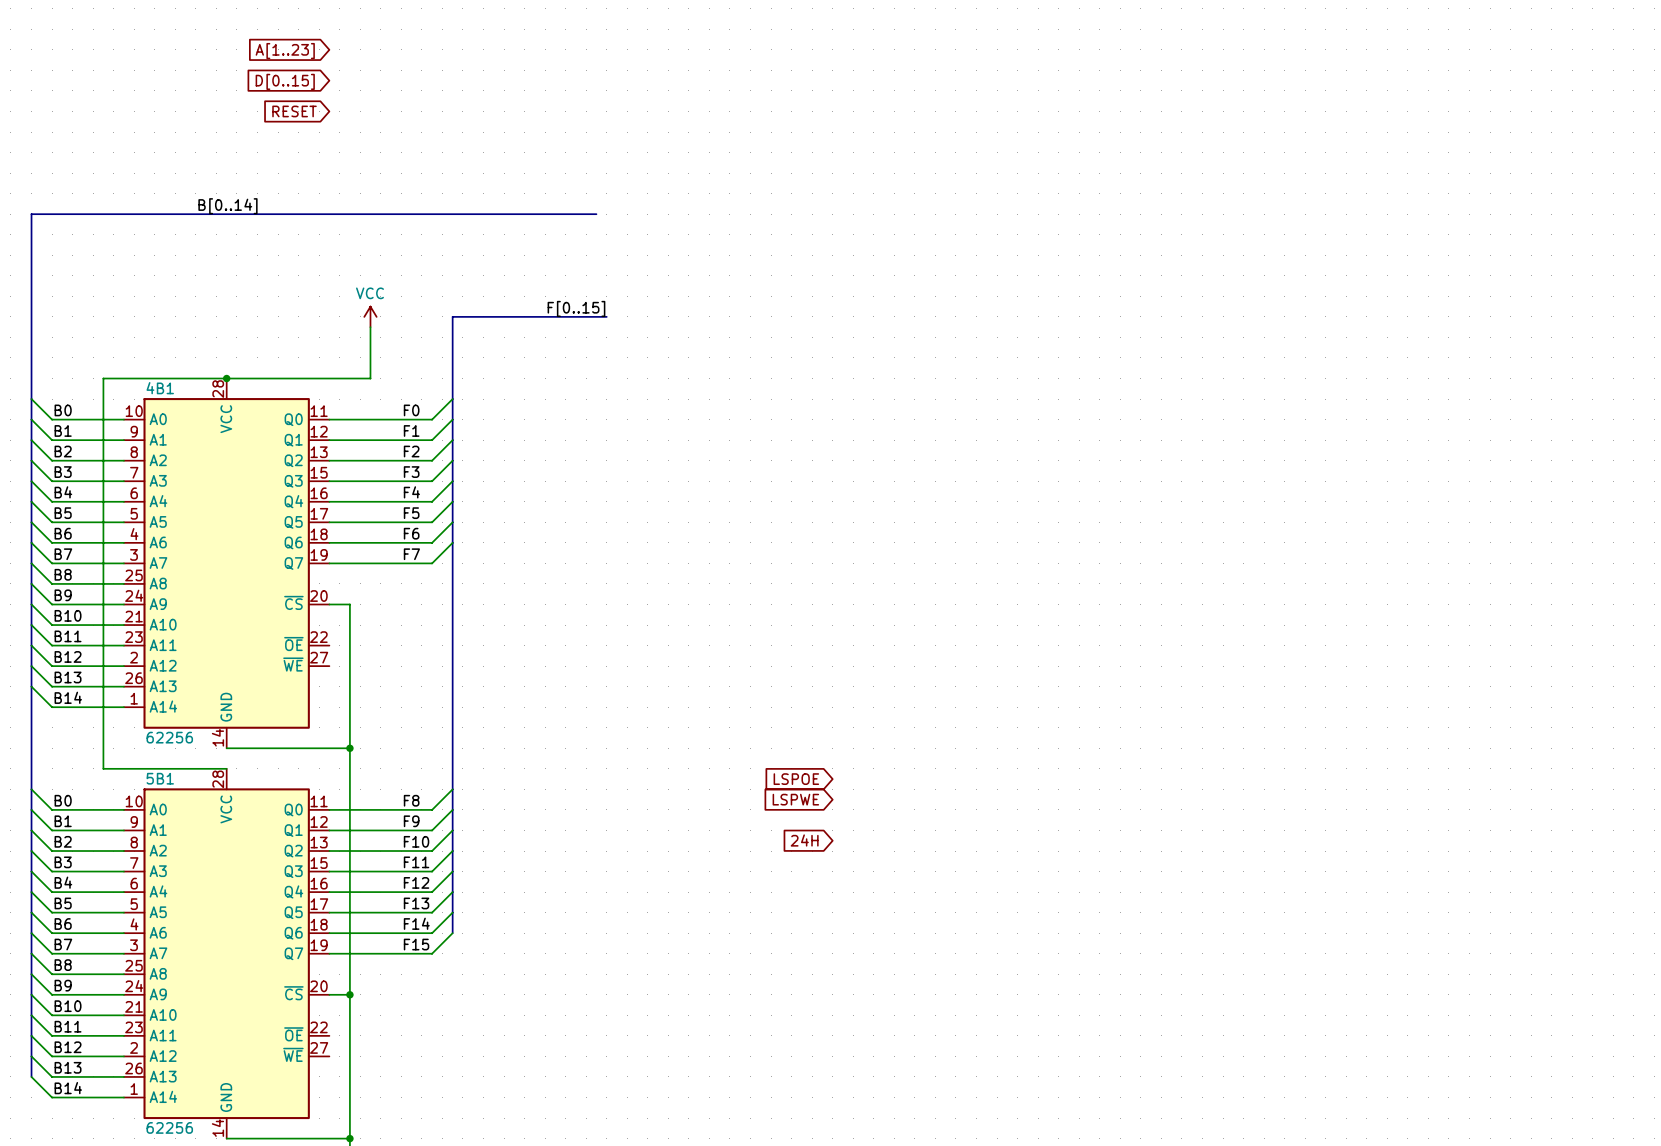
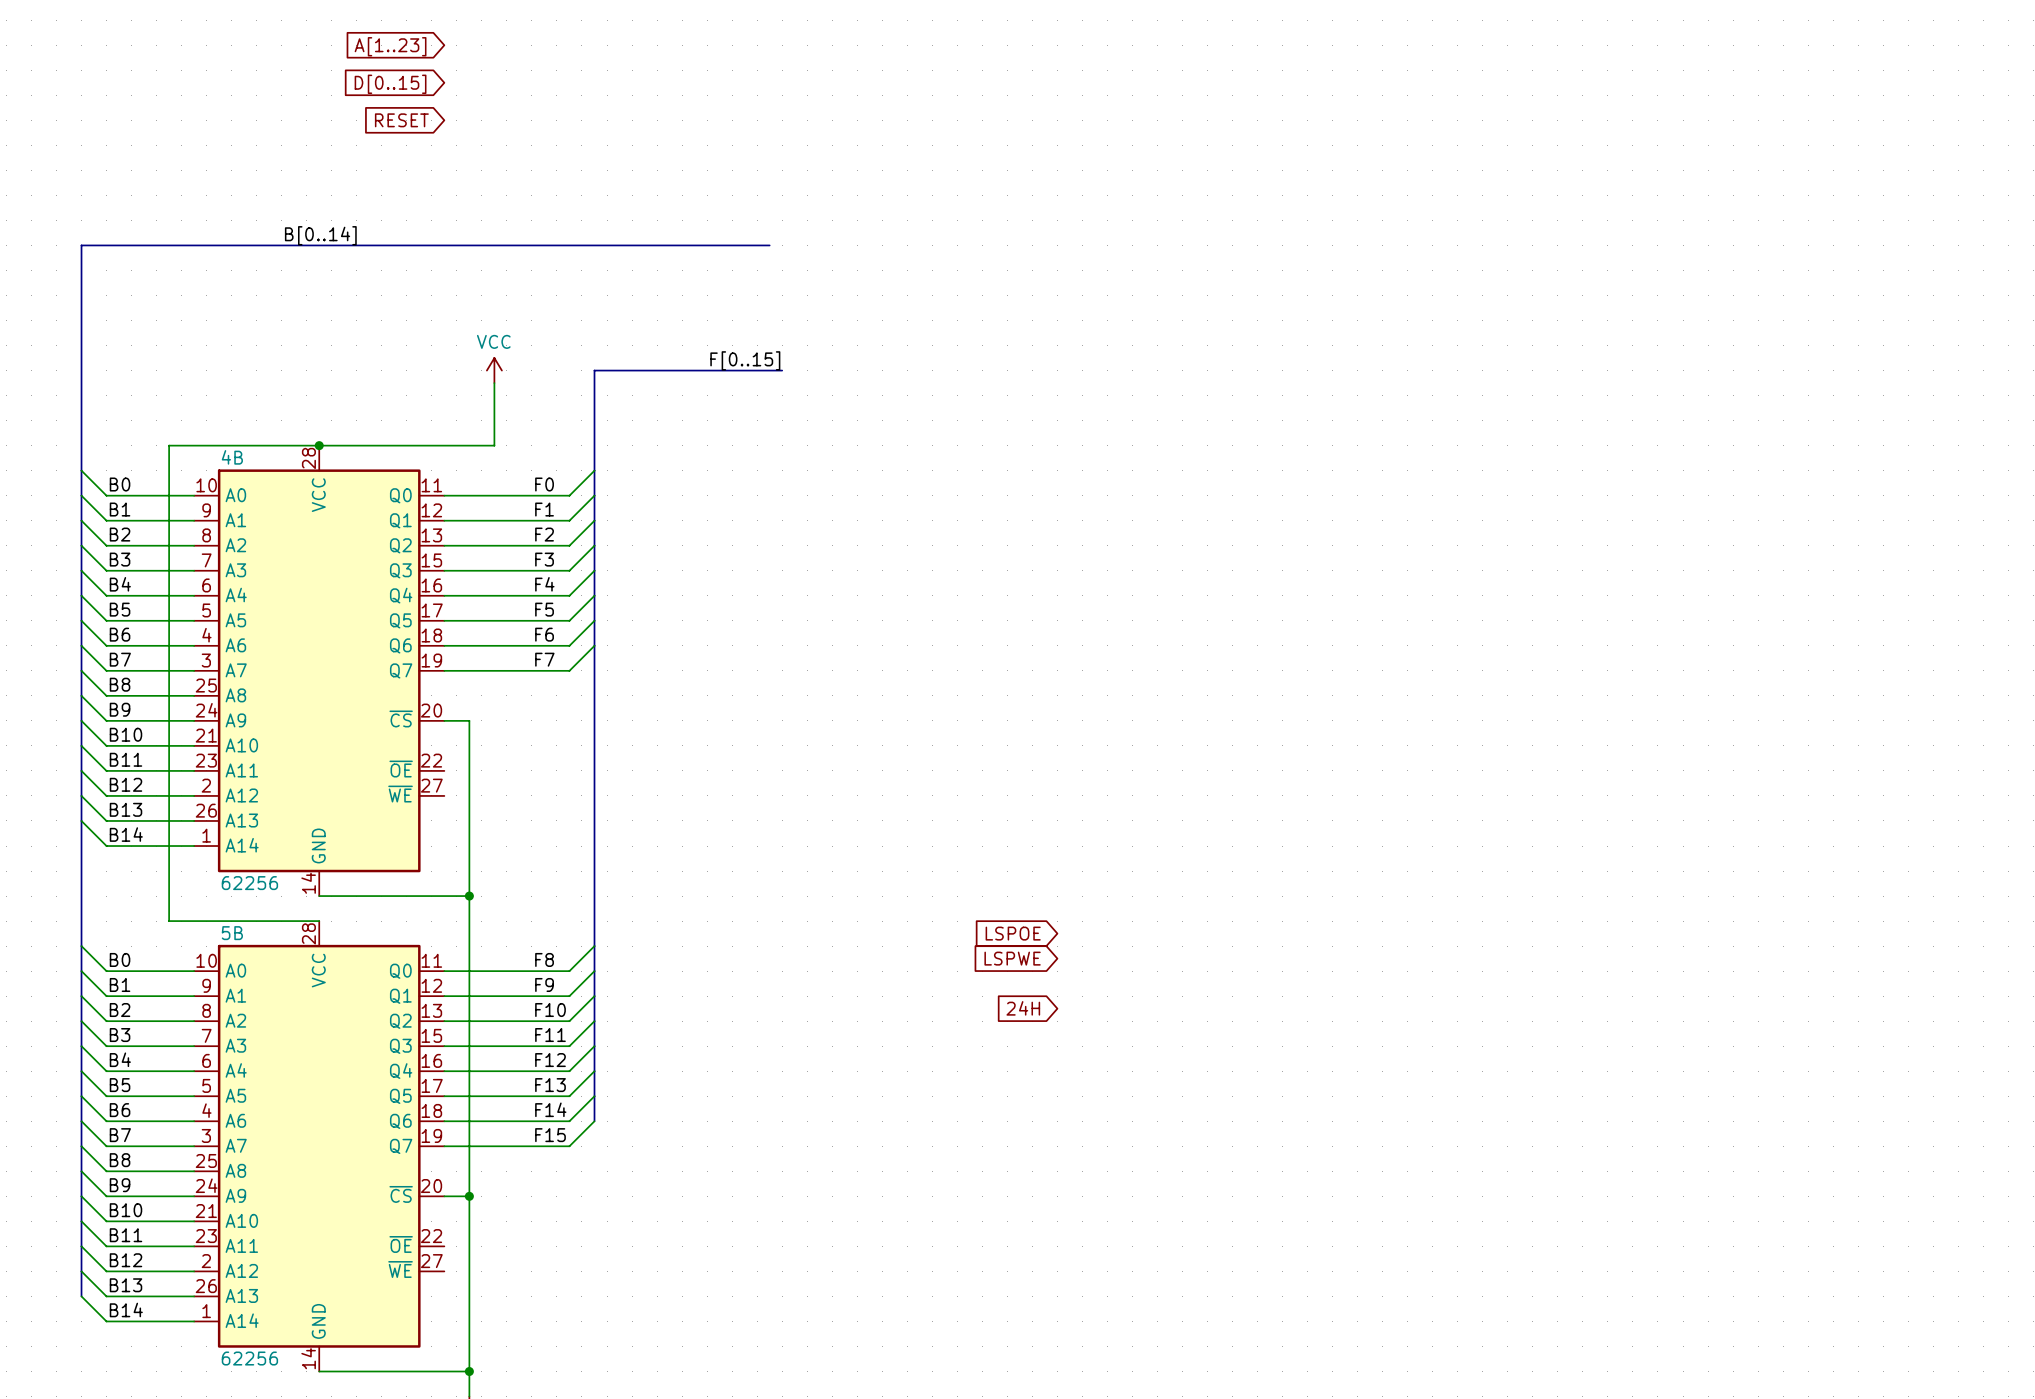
4B1 name: 4B1 (160, 388) -> 4B (232, 457)
5B1 name: 5B1 (160, 778) -> 5B (232, 933)

